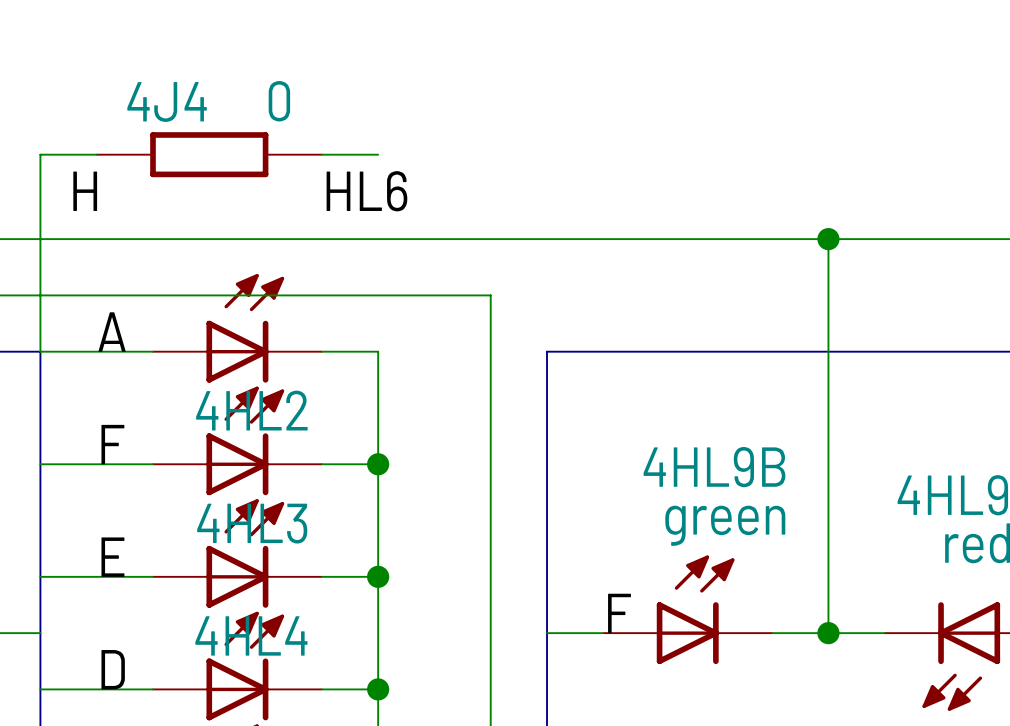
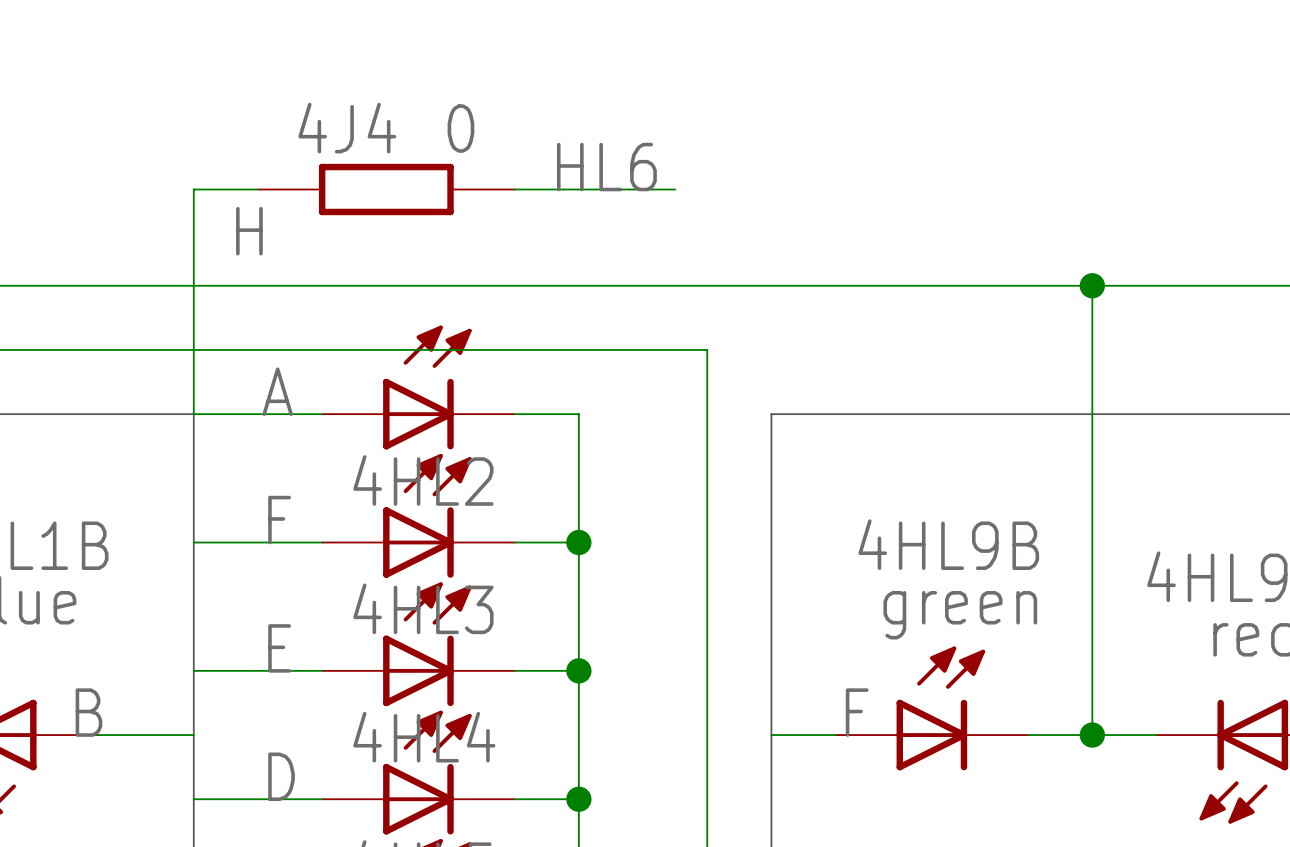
wire: none -> (578, 189) (675, 189)
label position: HL6 (366, 191) -> HL6 (606, 167)

